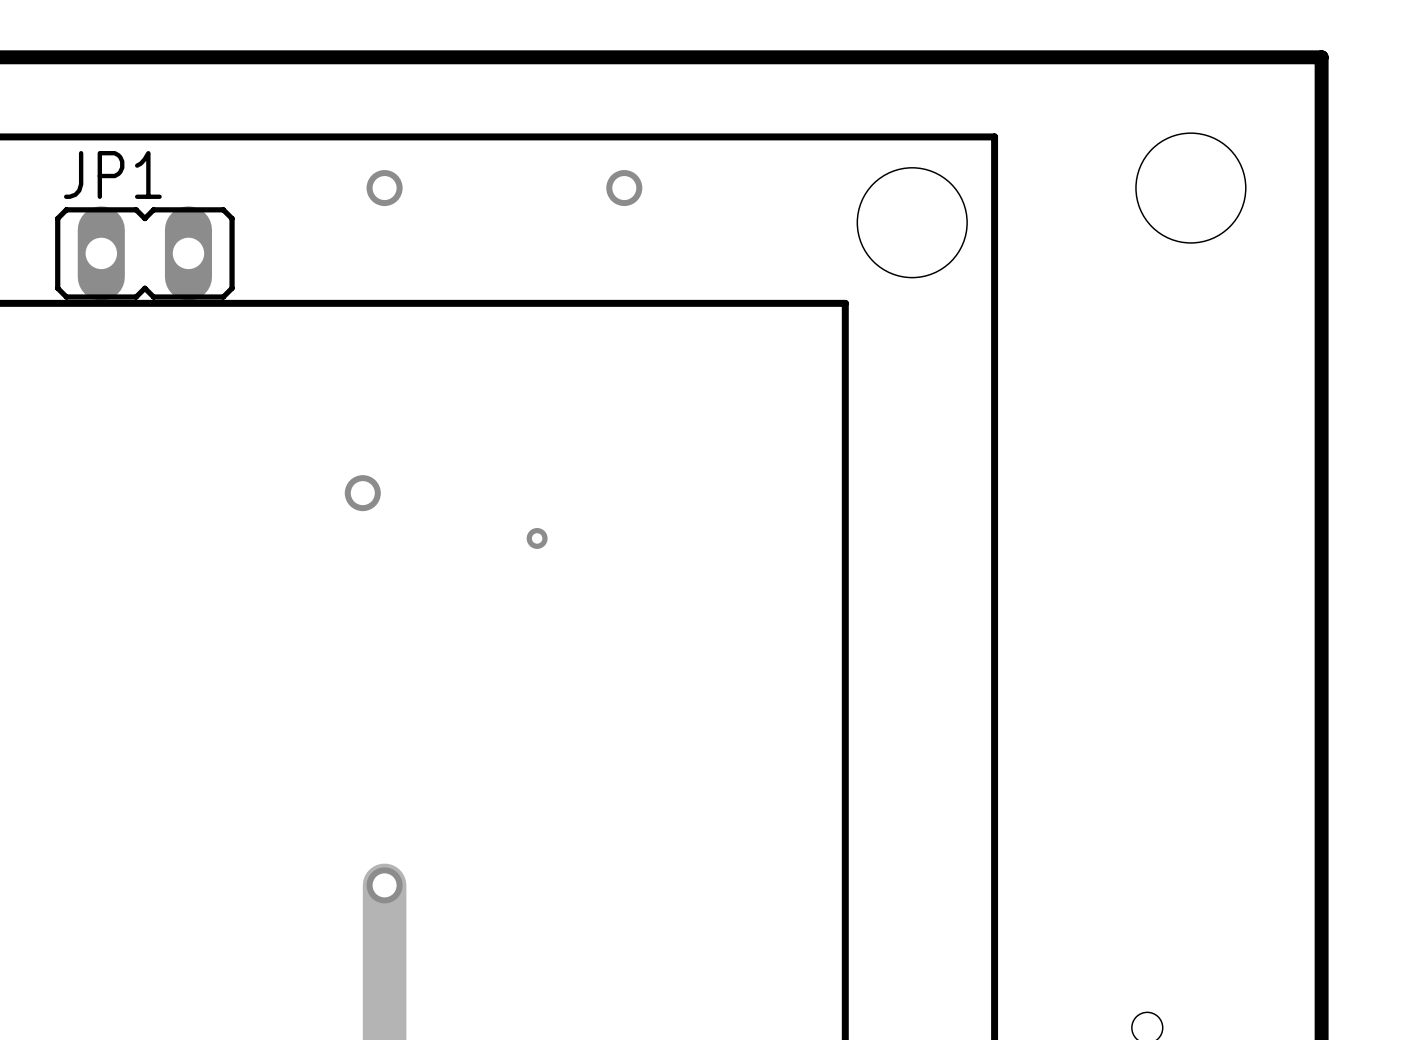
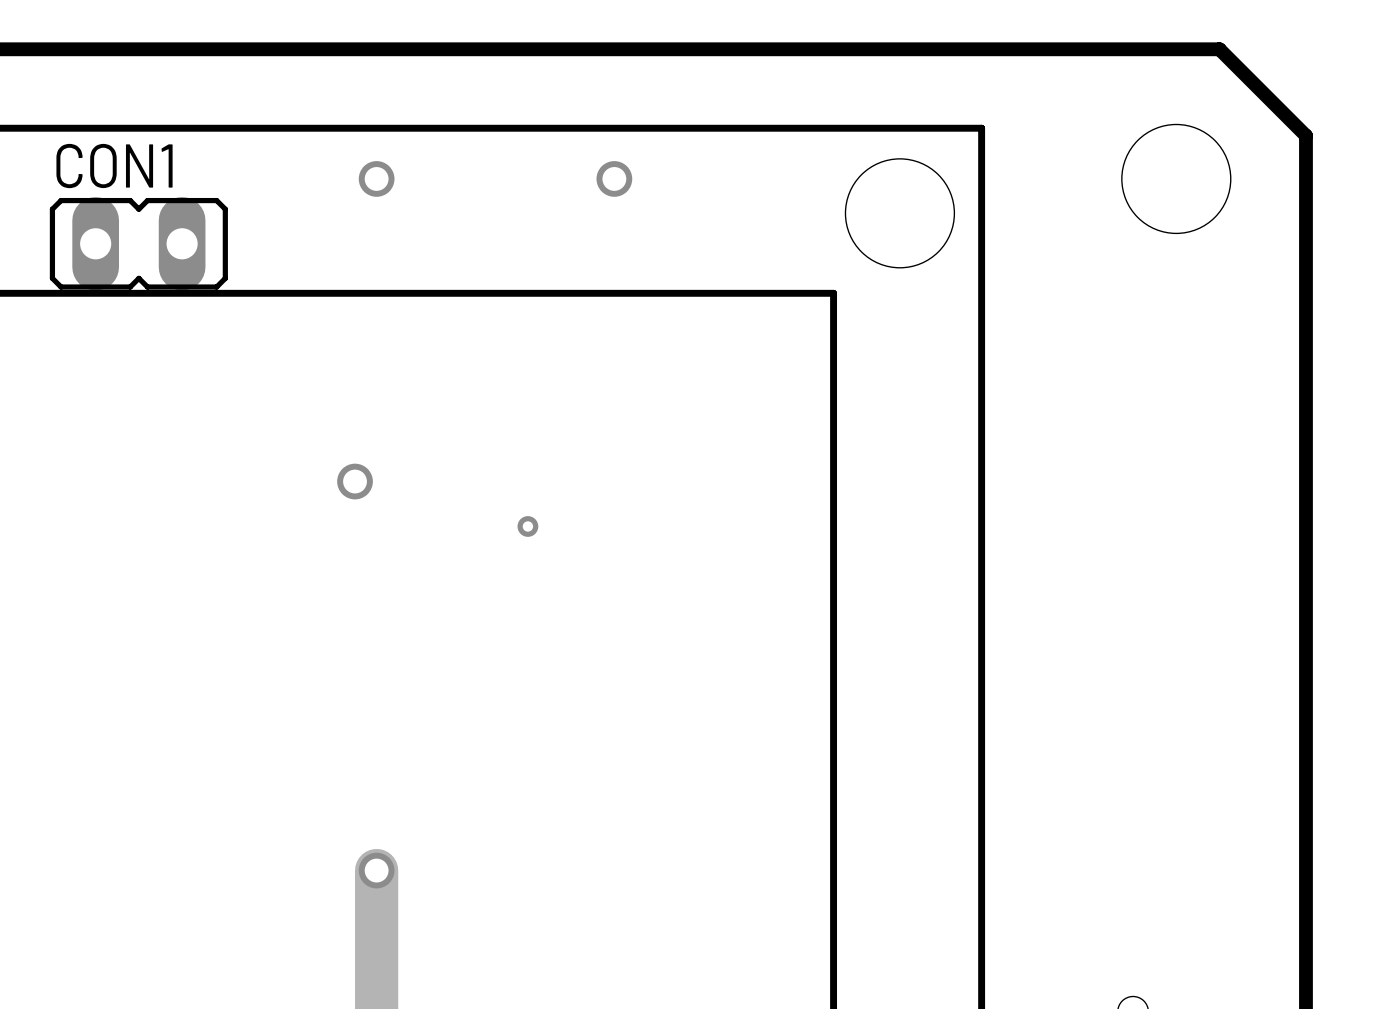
board edge: (1234, 57) (1321, 57) (1321, 144) -> (1219, 49) (1305, 135)
JP1 name: JP1 (112, 174) -> CON1 (114, 166)

